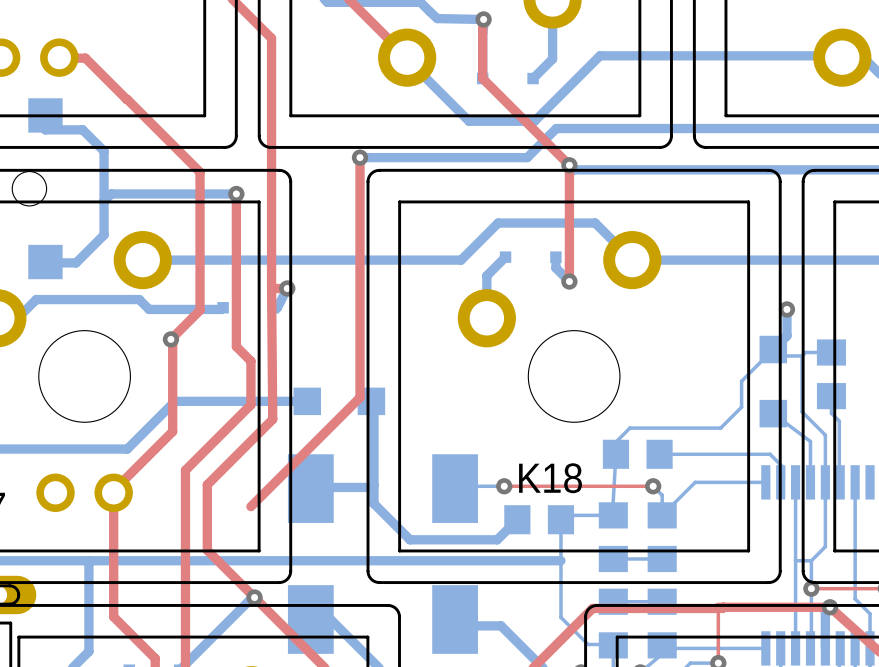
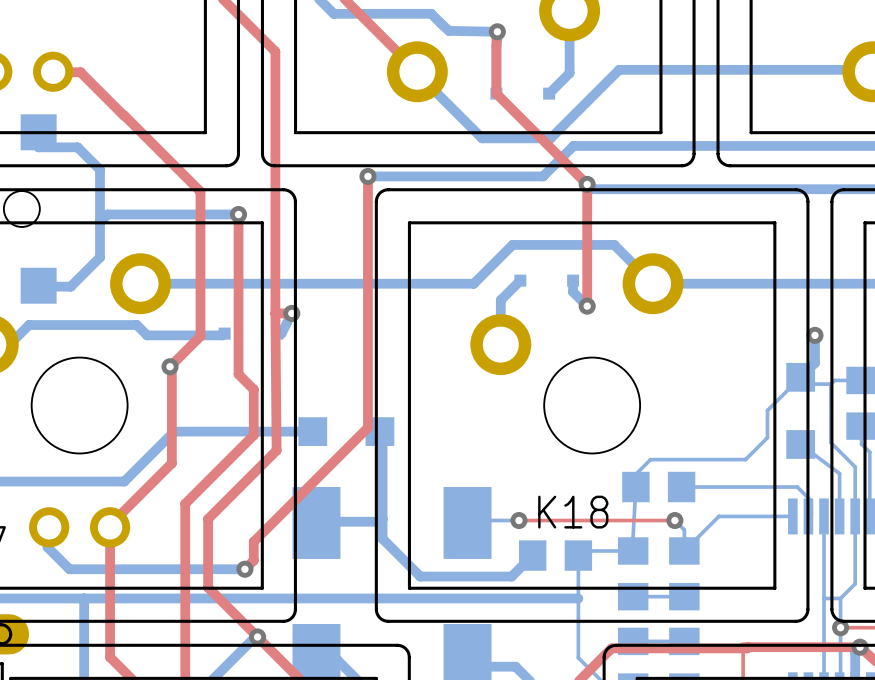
bottom track: none -> (49, 527) (47, 547) (69, 569) (244, 569)
top track: none -> (253, 541) (253, 560) (244, 569)
via: none -> (244, 569)

